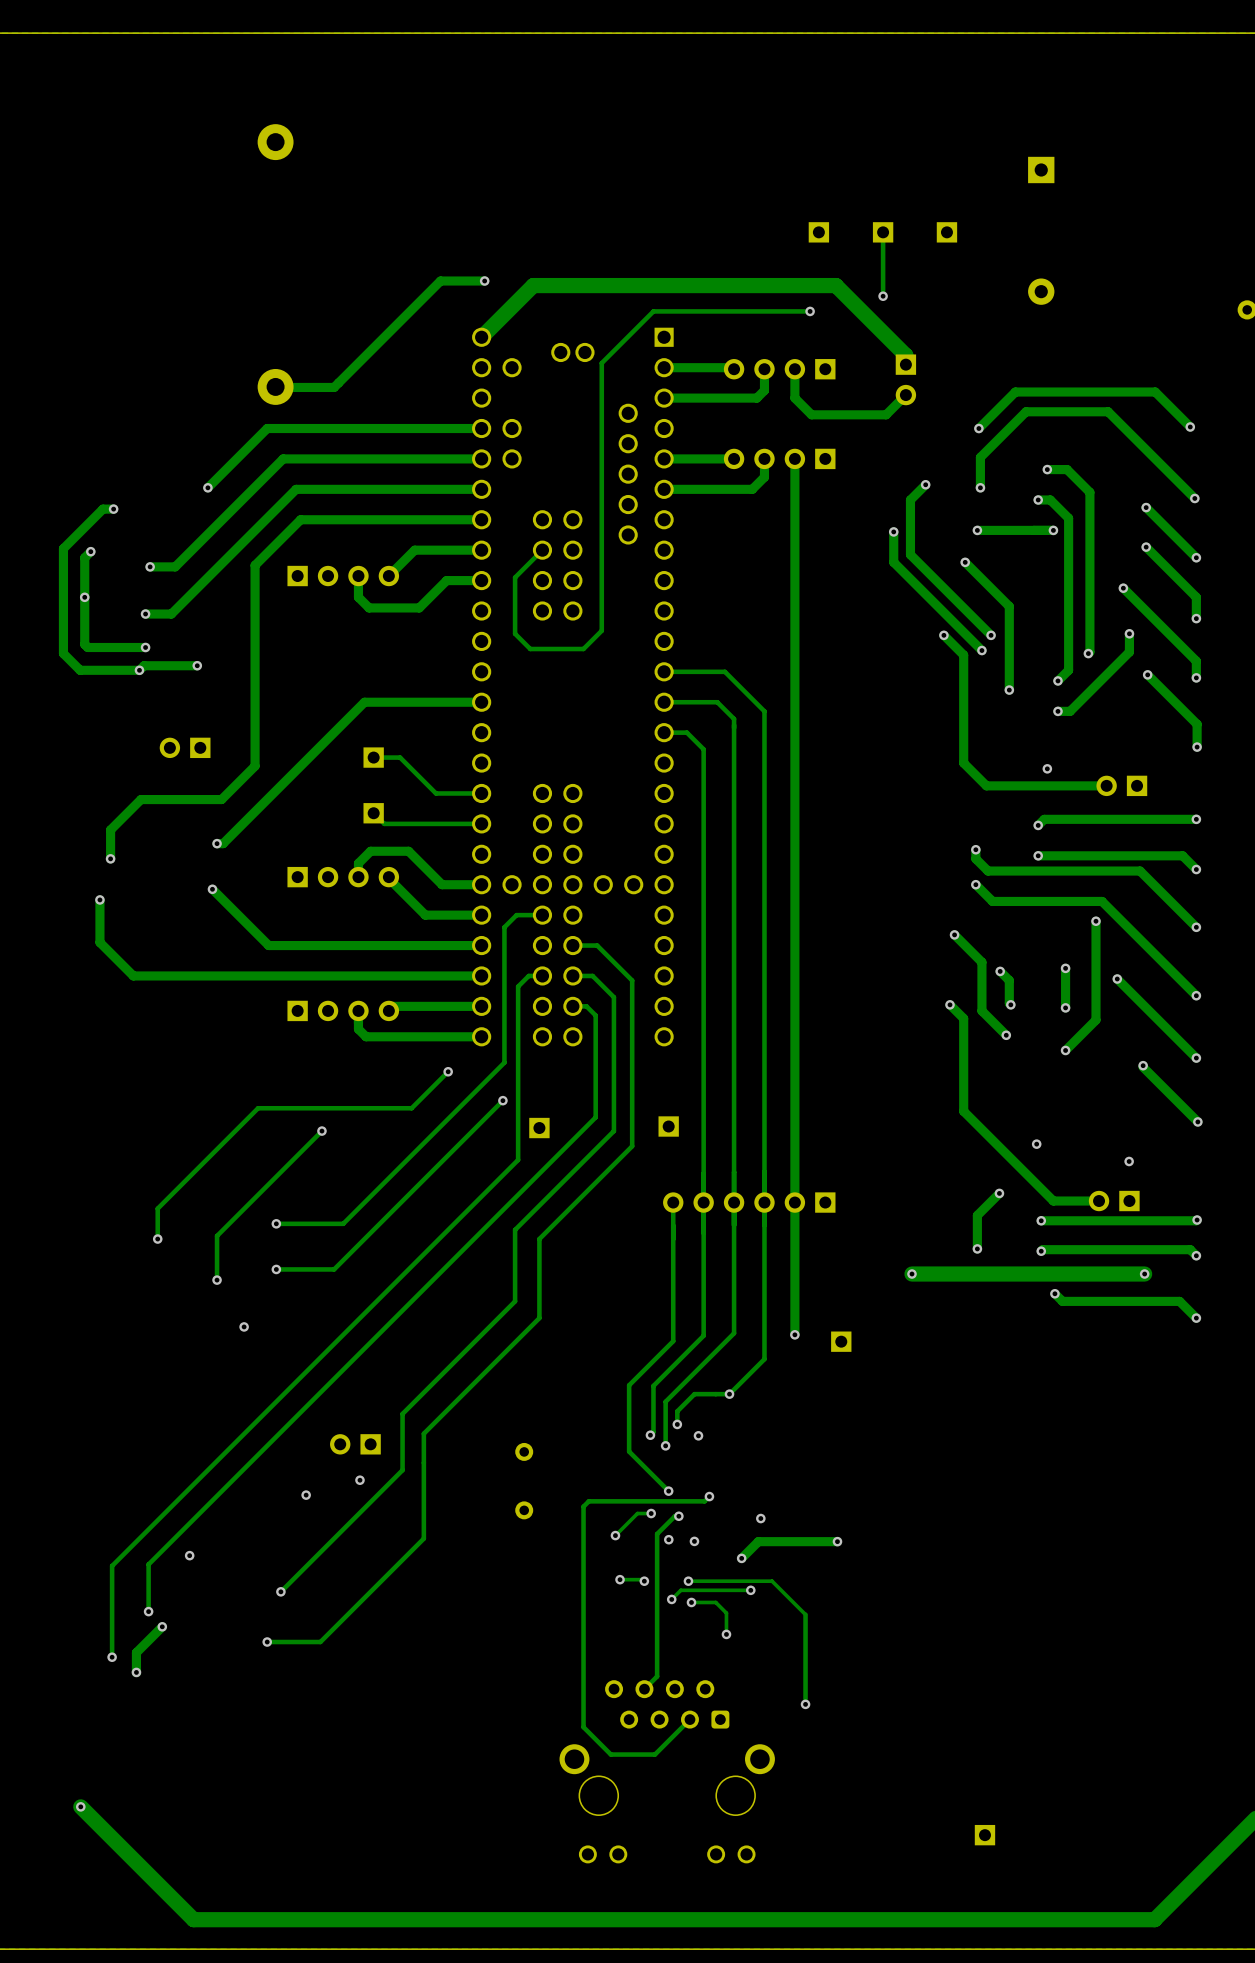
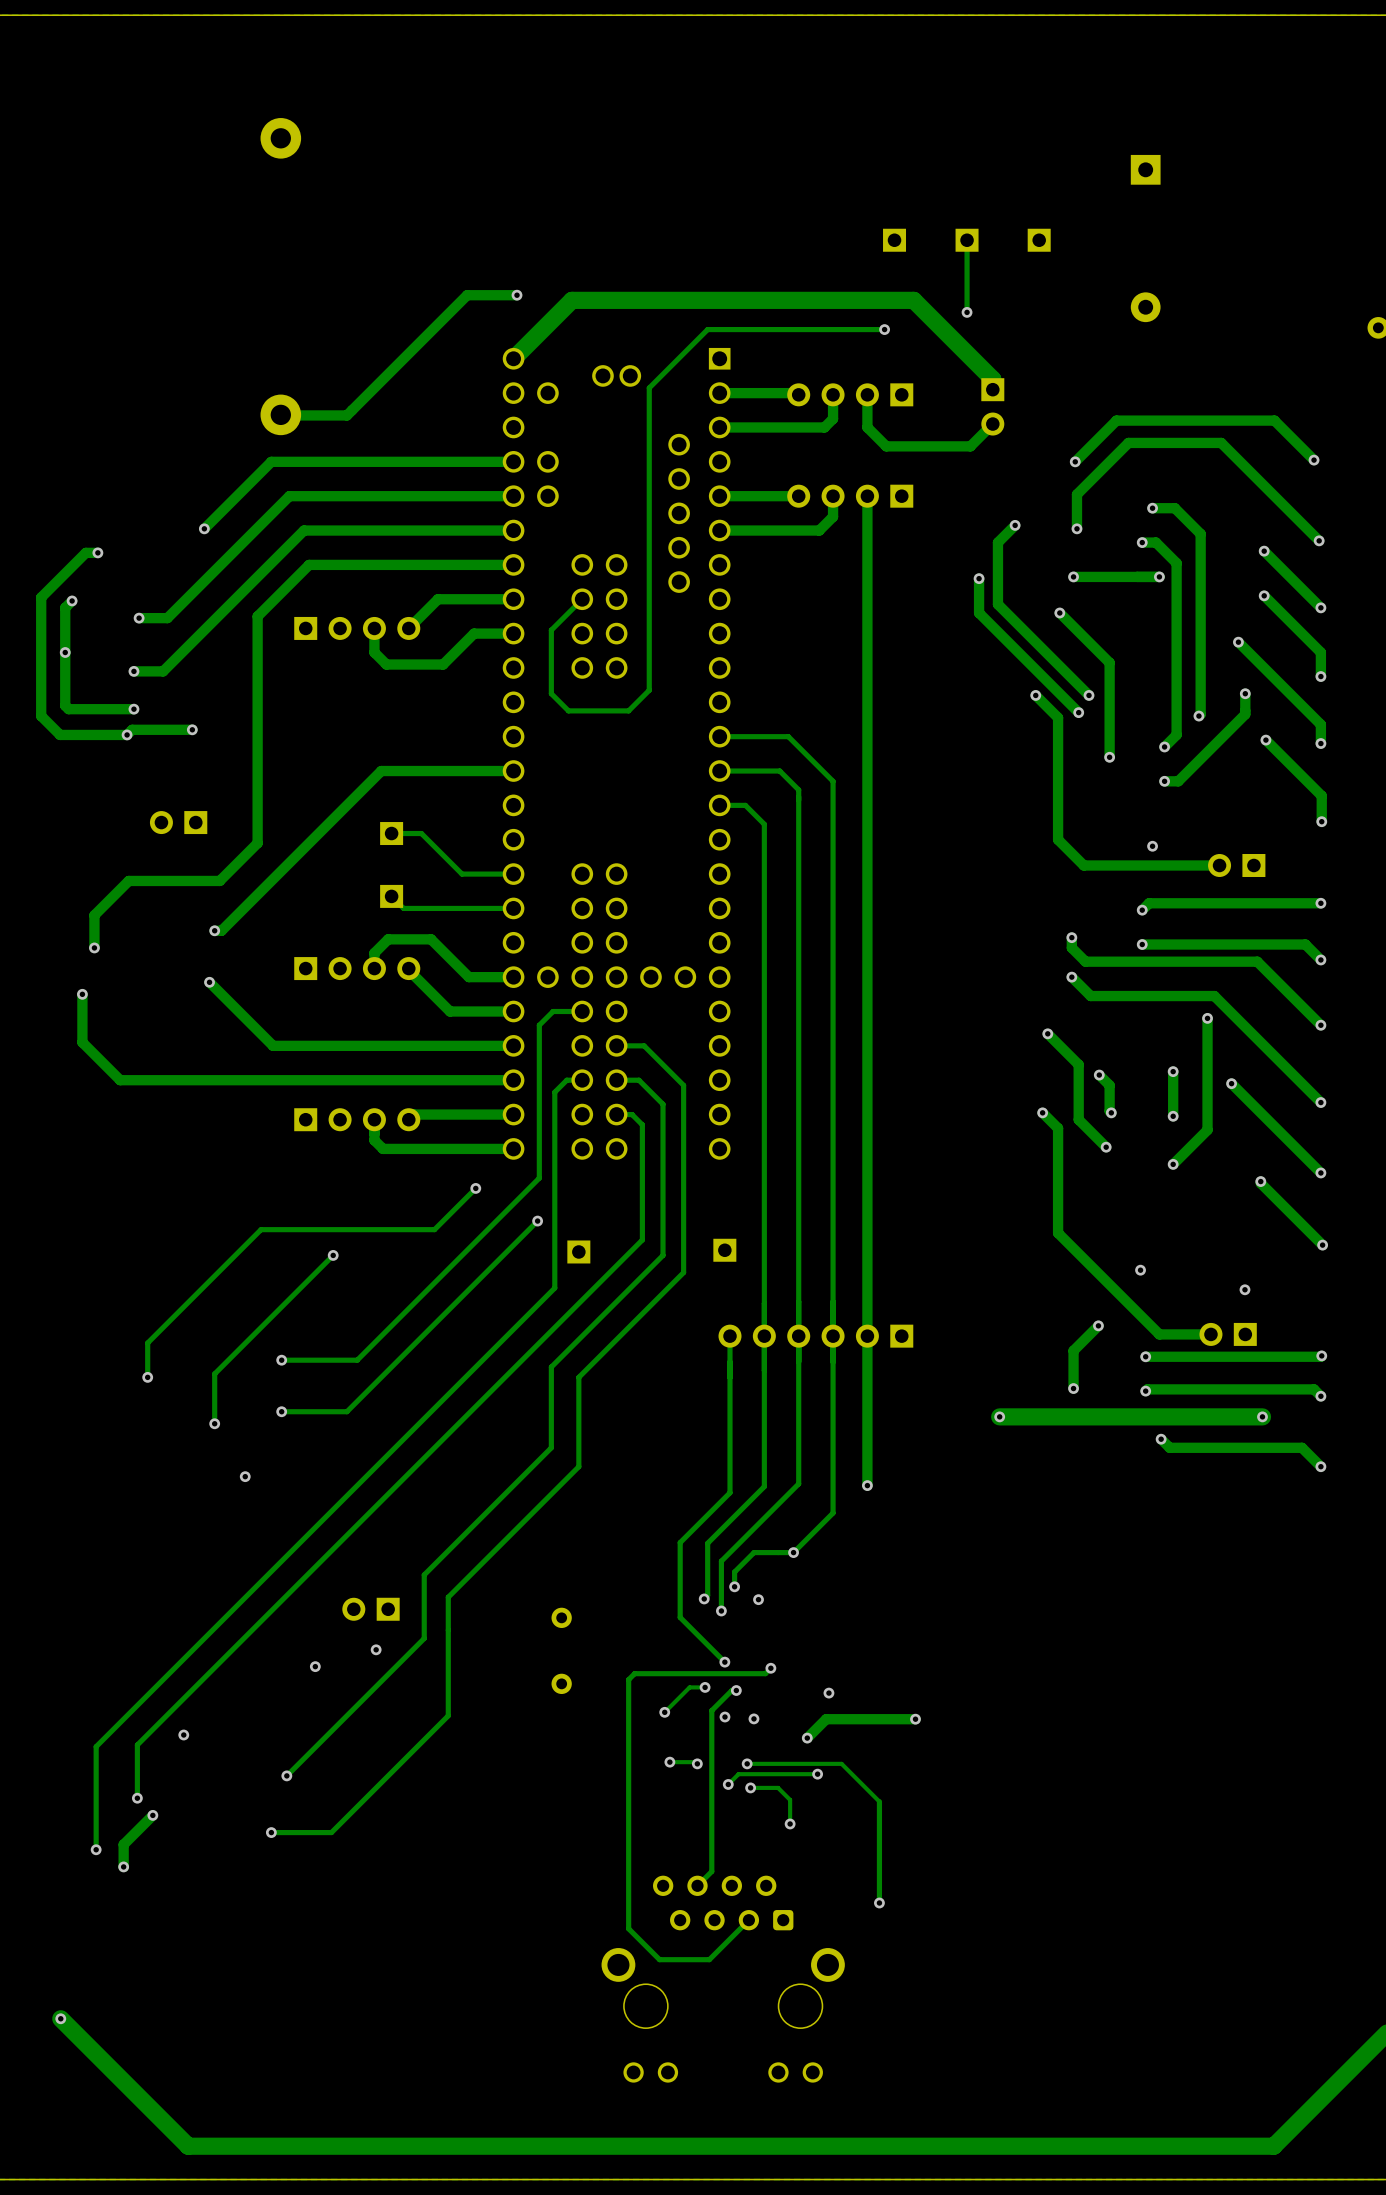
part: (841, 1341) -> none
part: (984, 1835) -> none

